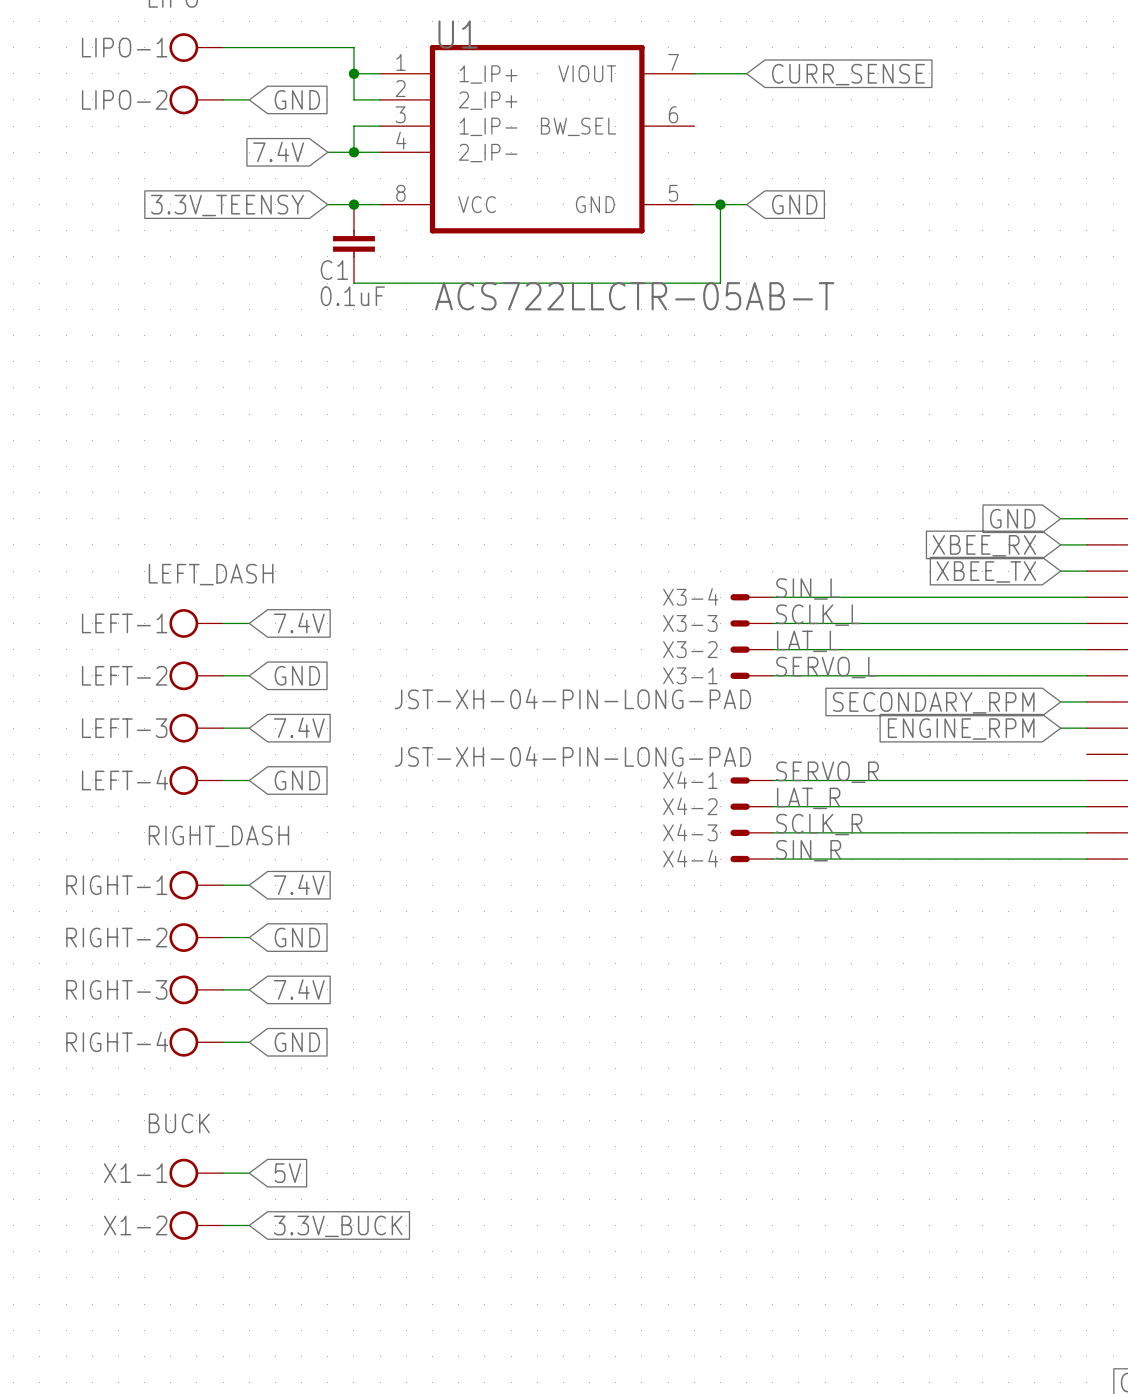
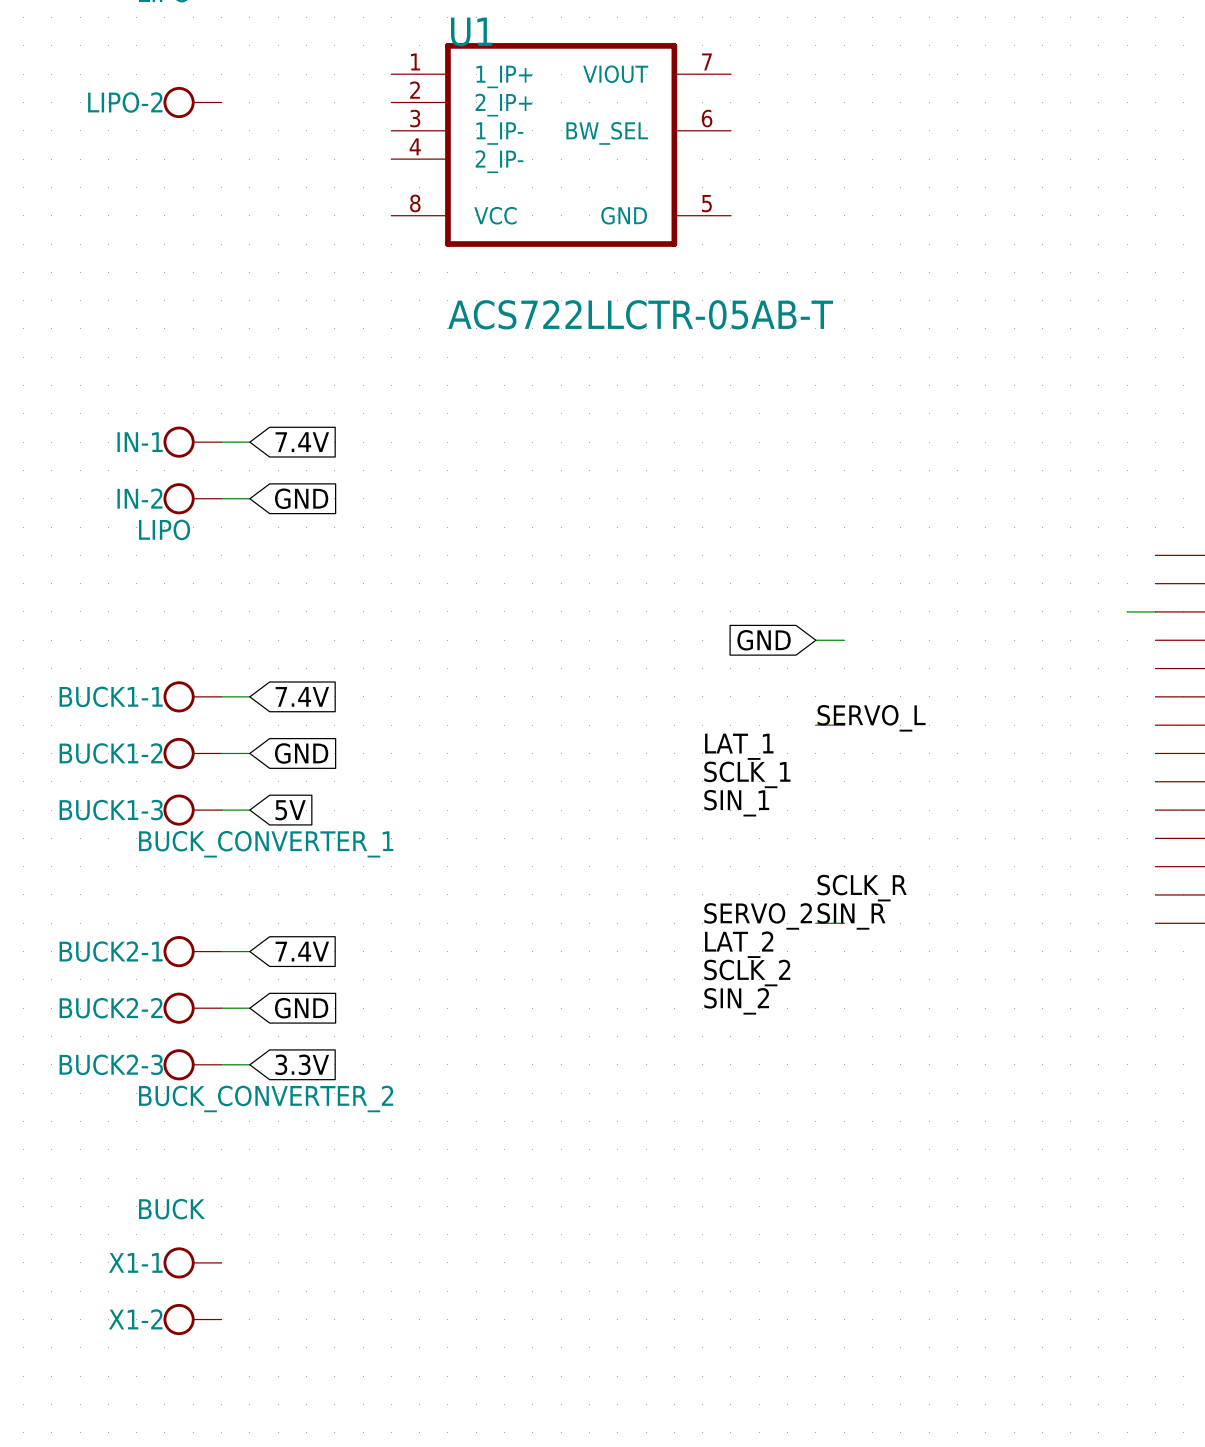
LIPO-1: (196, 47) -> none
wire: (223, 47) (353, 47) (353, 99) (380, 99) -> none
wire: (353, 73) (380, 73) -> none
junction: (353, 73) -> none
wire: (694, 73) (746, 73) -> none
global label: CURR_SENSE (848, 74) -> none
wire: (223, 99) (249, 99) -> none
global label: GND (297, 99) -> none
wire: (380, 126) (353, 126) (353, 152) -> none
global label: 7.4V (278, 151) -> none
wire: (327, 152) (380, 152) -> none
junction: (353, 152) -> none
wire: (327, 204) (380, 204) -> none
junction: (353, 204) -> none
wire: (694, 204) (746, 204) -> none
wire: (720, 204) (720, 283) (353, 283) -> none
junction: (720, 204) -> none
global label: GND (794, 204) -> none
global label: 3.3V_TEENSY (227, 205) -> none
C1: 0.1uF (353, 243) -> none
global label: none -> 7.4V (302, 442)
IN-1: none -> (192, 442)
wire: none -> (221, 442) (249, 442)
IN-2: none -> LIPO (192, 498)
wire: none -> (221, 498) (249, 498)
global label: none -> GND (301, 498)
global label: GND (1012, 518) -> none
wire: (1060, 518) (1086, 518) -> none
wire: (1060, 544) (1086, 544) -> none
global label: XBEE_RX (984, 545) -> none
global label: XBEE_TX (986, 571) -> none
label: SIN_L (807, 588) -> none
global label: none -> GND (764, 640)
X3-4: (751, 597) -> none
wire: (798, 597) (1086, 597) -> none
label: SCLK_L (818, 615) -> none
LEFT-1: (196, 623) -> none
wire: (223, 623) (249, 623) -> (221, 696) (249, 696)
global label position: 7.4V (299, 623) -> 7.4V (302, 696)
X3-3: (751, 623) -> none
wire: (772, 623) (1086, 623) -> none
label: LAT_L (807, 641) -> none
BUCK1-1: none -> (192, 696)
X3-2: (751, 649) -> none
wire: (772, 649) (1086, 649) -> none
LEFT-2: (196, 675) -> none
wire: (223, 675) (249, 675) -> (221, 753) (249, 753)
global label position: GND (297, 675) -> GND (301, 753)
X3-1: JST-XH-04-PIN-LONG-PAD (751, 675) -> none
wire: (798, 675) (1086, 675) -> none
label: none -> LAT_1 (739, 746)
BUCK1-2: none -> (192, 753)
wire: (1060, 701) (1086, 701) -> none
global label: SECONDARY_RPM (933, 702) -> none
label: none -> SCLK_1 (747, 774)
global label: 7.4V (299, 727) -> none
LEFT-3: (196, 728) -> none
wire: (223, 728) (249, 728) -> (221, 810) (249, 810)
wire: (1060, 728) (1086, 728) -> none
global label: ENGINE_RPM (961, 729) -> none
label: none -> SIN_1 (736, 803)
BUCK1-3: none -> BUCK_CONVERTER_1 (192, 810)
global label: none -> 5V (290, 810)
label: SERVO_R (827, 772) -> none
LEFT-4: LEFT_DASH (196, 780) -> none
wire: (223, 780) (249, 780) -> none
global label: GND (297, 780) -> none
X4-1: JST-XH-04-PIN-LONG-PAD (751, 780) -> none
wire: (772, 780) (1086, 780) -> none
label: LAT_R (808, 798) -> none
X4-2: (751, 806) -> none
wire: (772, 806) (1086, 806) -> none
X4-3: (751, 832) -> none
wire: (772, 832) (1086, 832) -> none
label: none -> SERVO_2 (758, 916)
X4-4: (751, 859) -> none
wire: (798, 859) (1086, 859) -> none
label: none -> LAT_2 (739, 944)
RIGHT-1 name: RIGHT-1 (116, 885) -> BUCK2-1 (111, 951)
label: none -> SCLK_2 (747, 973)
label: none -> SIN_2 (736, 1001)
RIGHT-2 name: RIGHT-2 (116, 937) -> BUCK2-2 (111, 1008)
RIGHT-3 name: RIGHT-3 (116, 989) -> BUCK2-3 (111, 1064)
global label: 7.4V (299, 989) -> 3.3V (302, 1064)
RIGHT-3 value: none -> BUCK_CONVERTER_2 (266, 1098)
RIGHT-4: RIGHT_DASH (196, 1042) -> none
wire: (223, 1042) (249, 1042) -> none
global label: GND (297, 1042) -> none
wire: (223, 1173) (249, 1173) -> none
global label: 5V (287, 1173) -> none
wire: (223, 1225) (249, 1225) -> none
global label: 3.3V_BUCK (338, 1226) -> none

